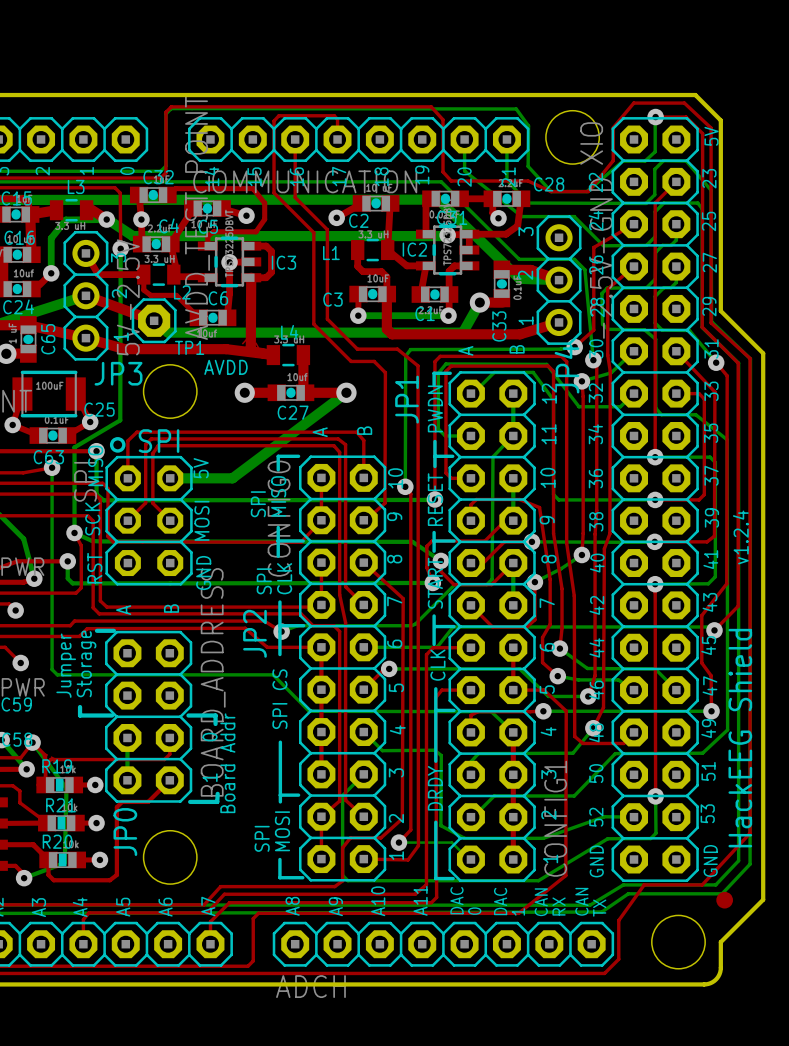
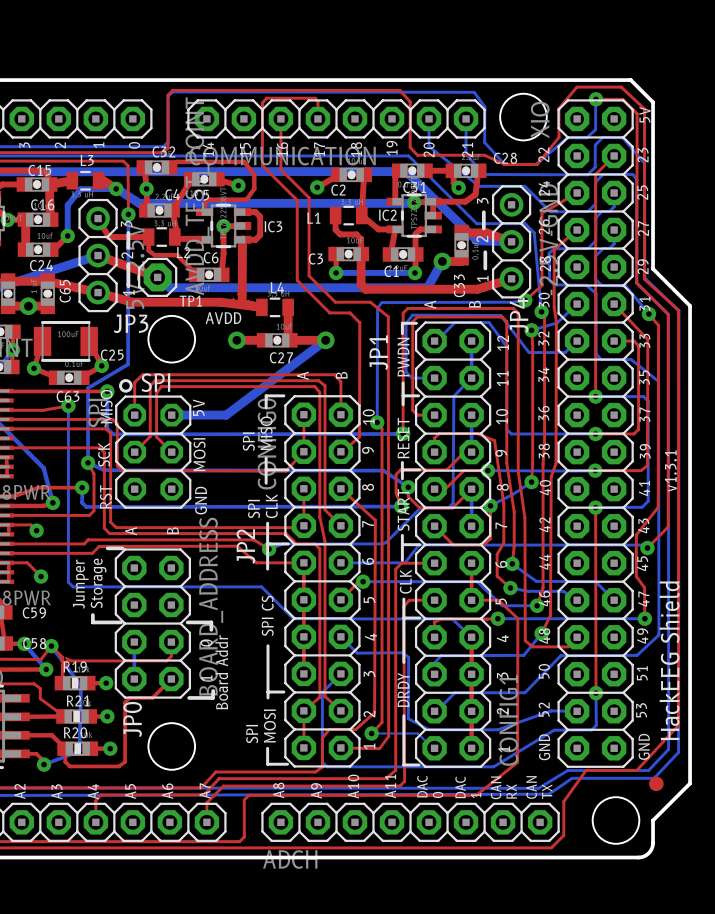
line: none -> (483, 212) (483, 228)
line: none -> (128, 232) (128, 247)
line: none -> (485, 252) (485, 268)
line: none -> (128, 264) (128, 286)
text: v1.2.4 (740, 537) -> v1.3.1 (670, 471)

